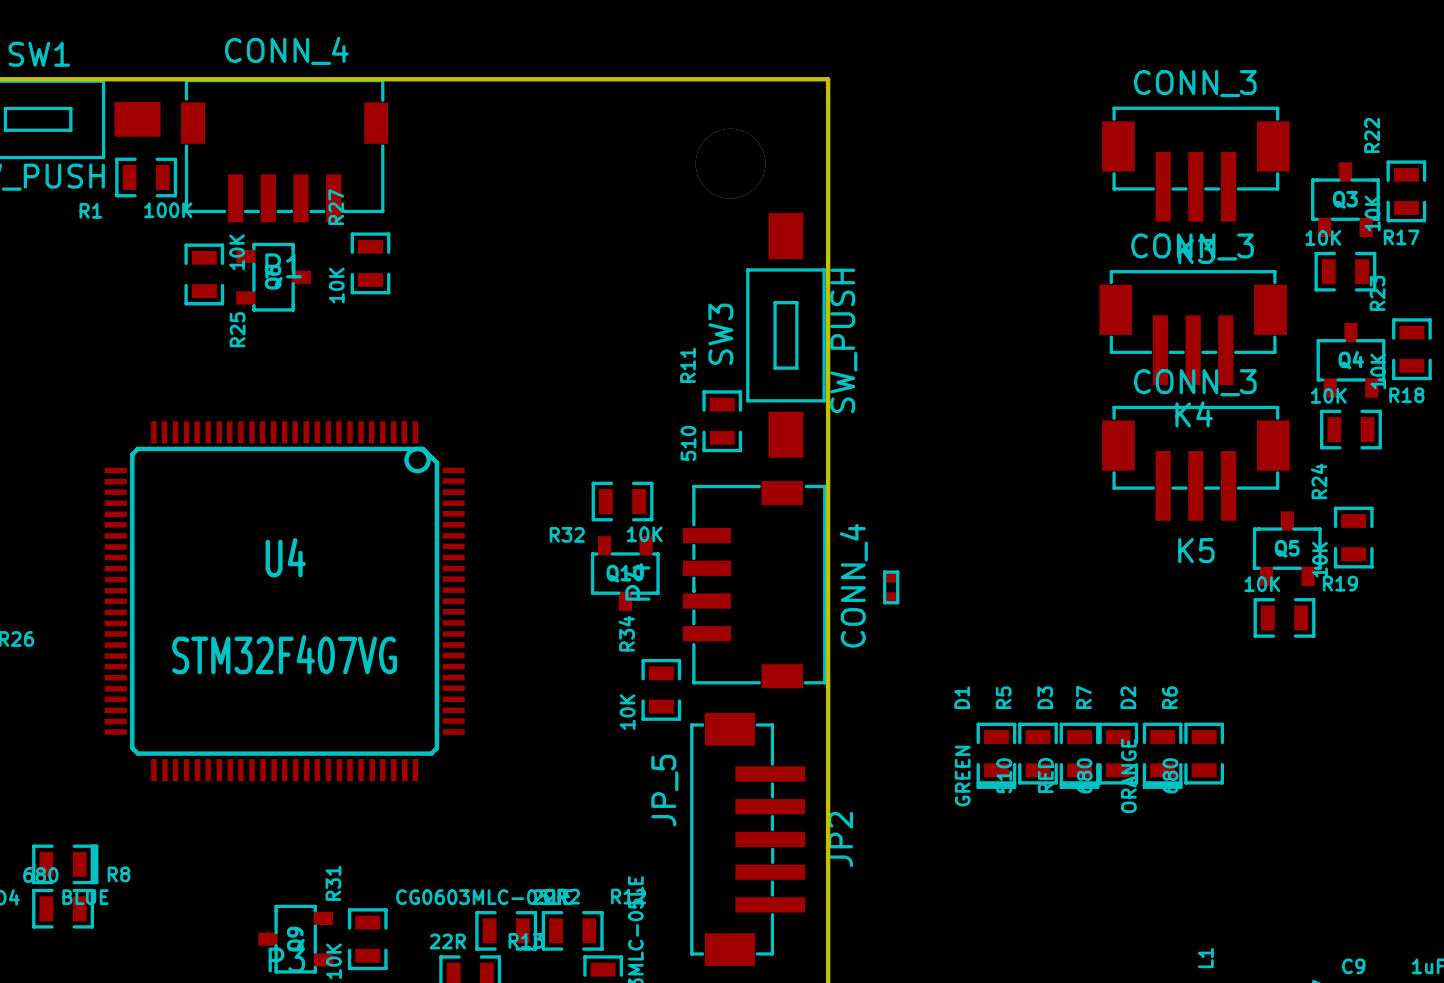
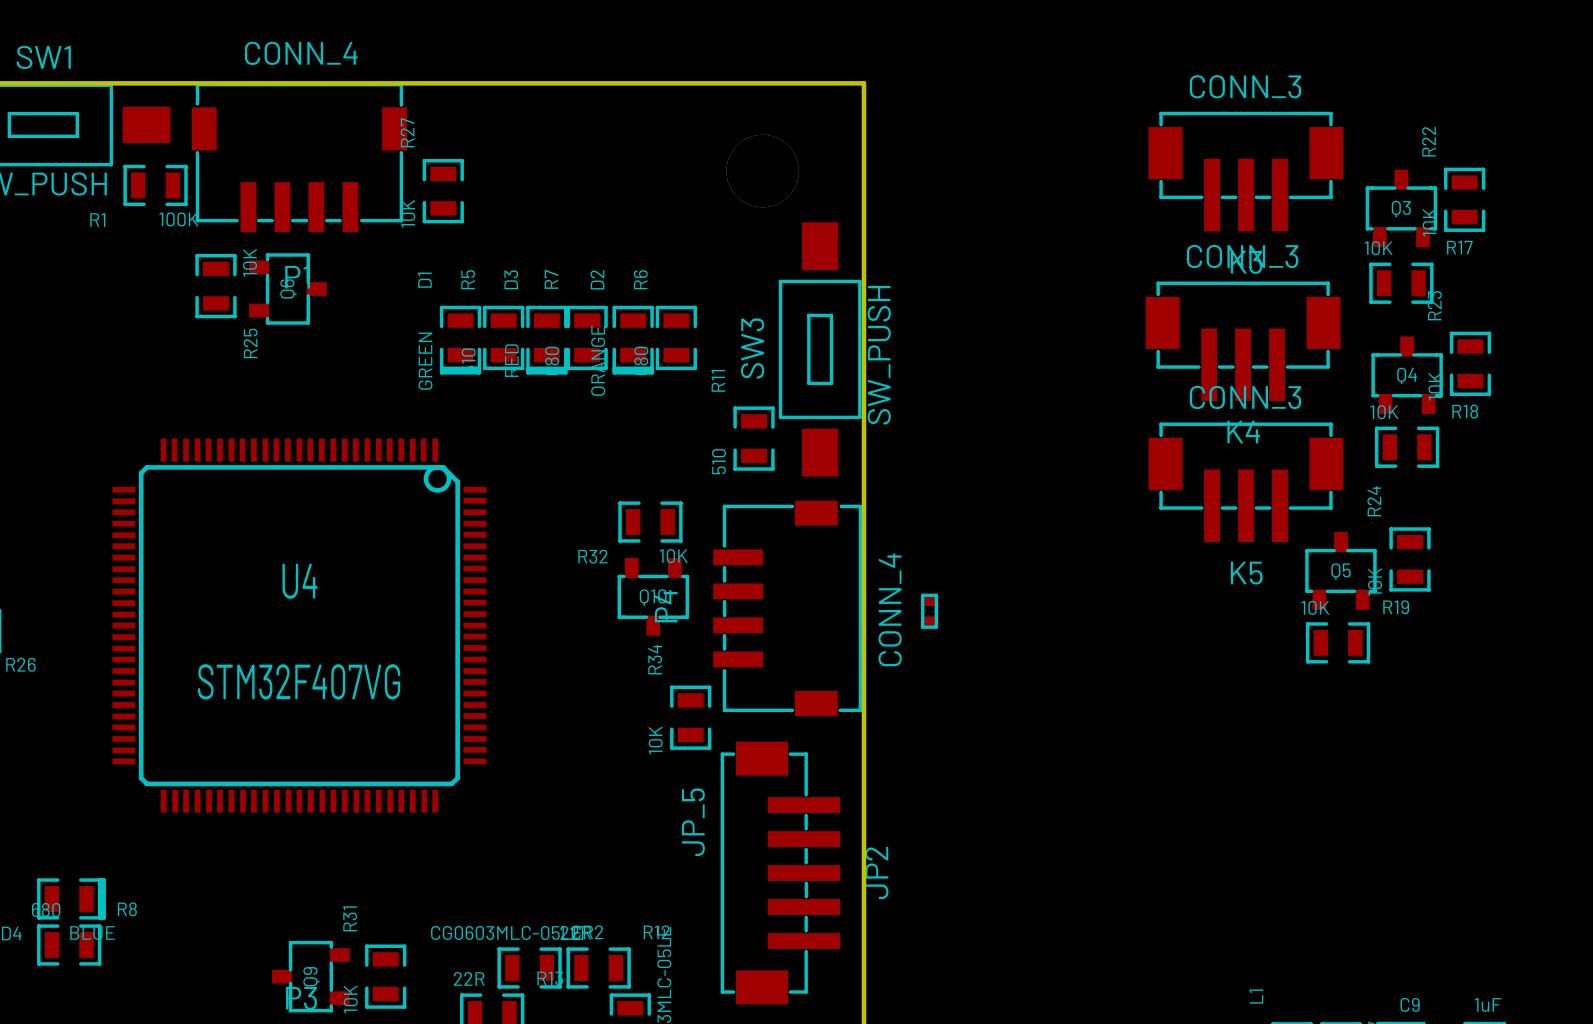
R27 position: (370, 263) -> (443, 191)
R5 position: (1037, 753) -> (503, 337)
R7 position: (1118, 753) -> (587, 337)
R6 position: (1204, 753) -> (676, 337)
D1 position: (996, 755) -> (460, 340)
D3 position: (1079, 755) -> (546, 340)
D2 position: (1162, 755) -> (633, 340)

